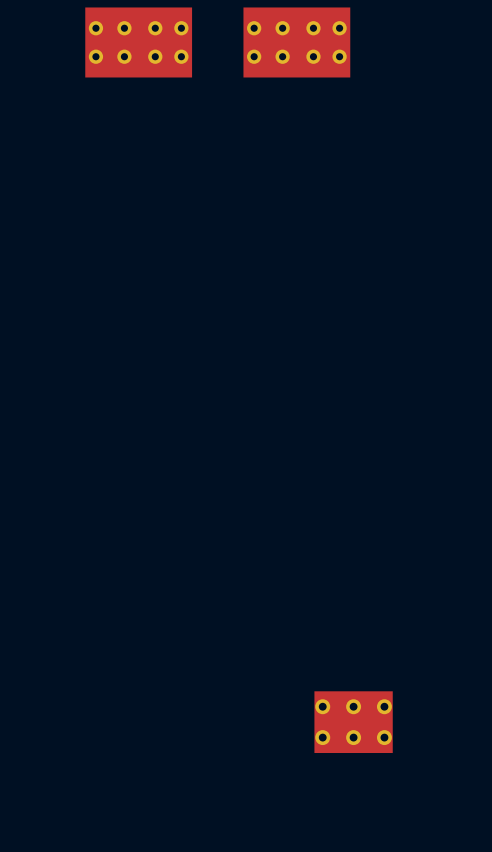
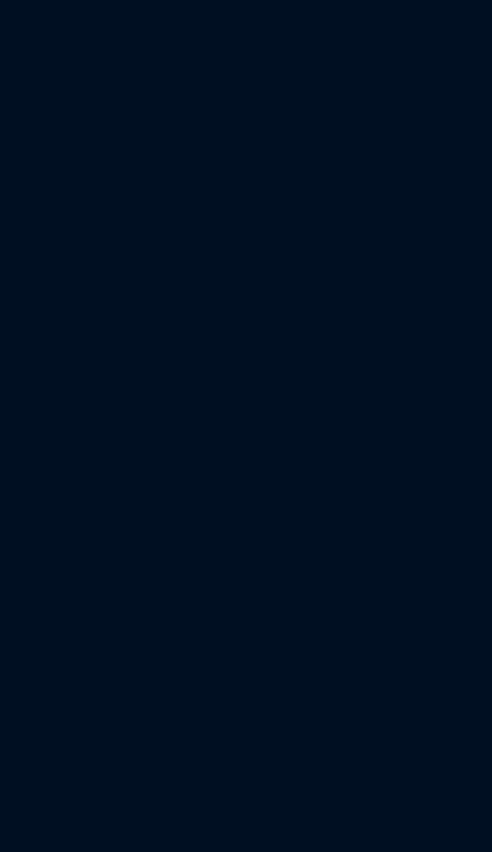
part: (138, 42) -> none
part: (296, 42) -> none
part: (353, 722) -> none

